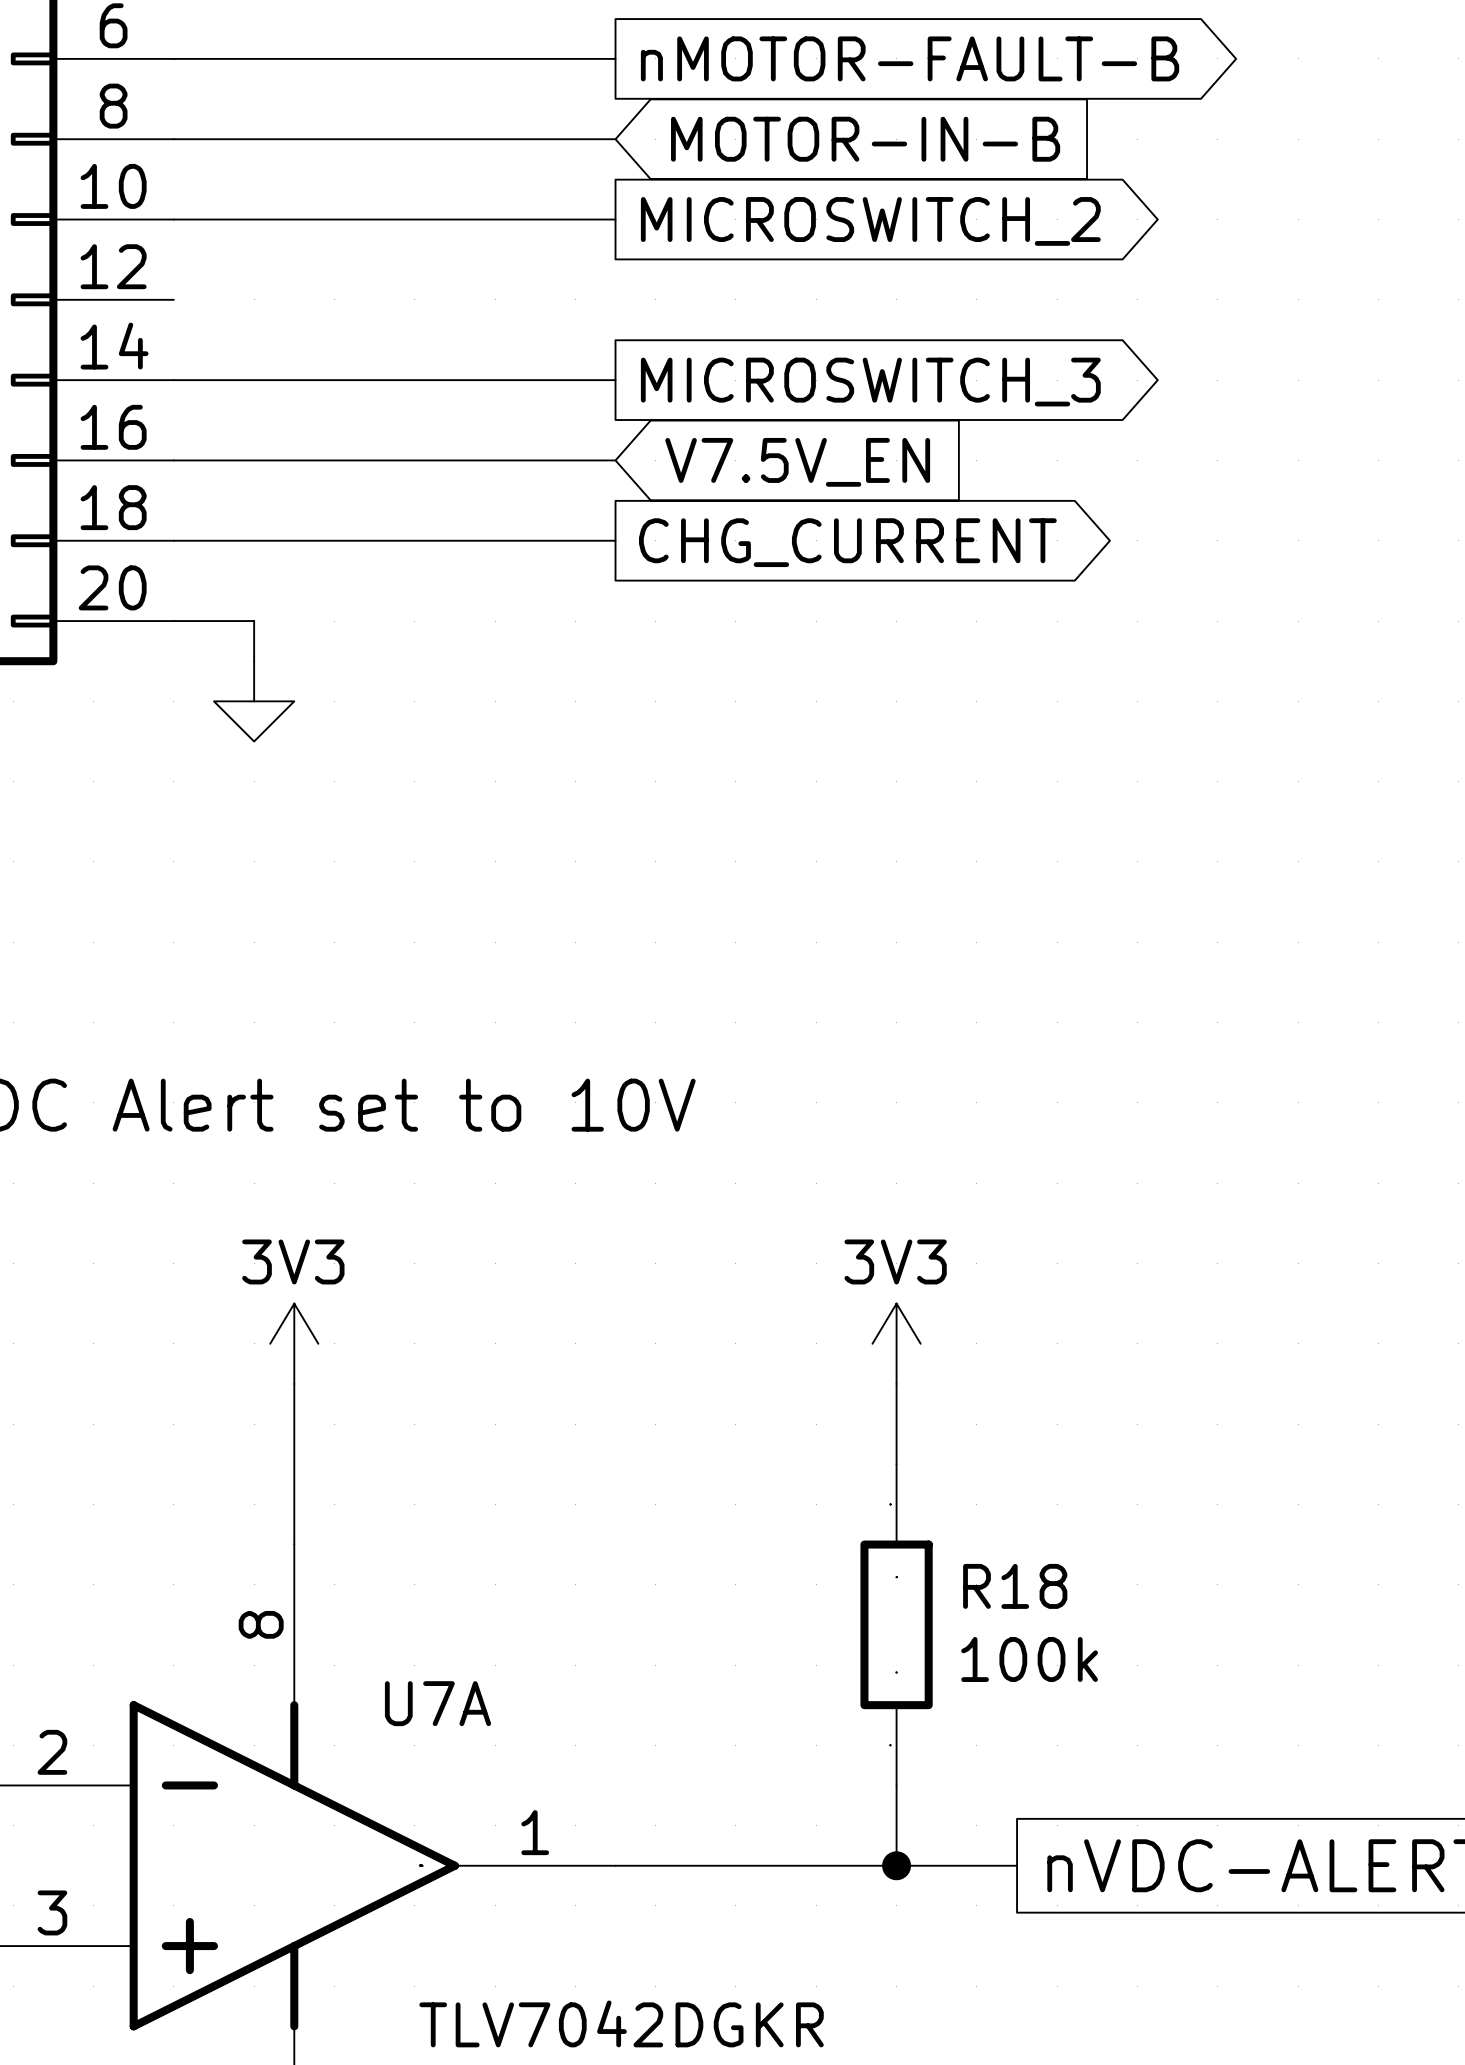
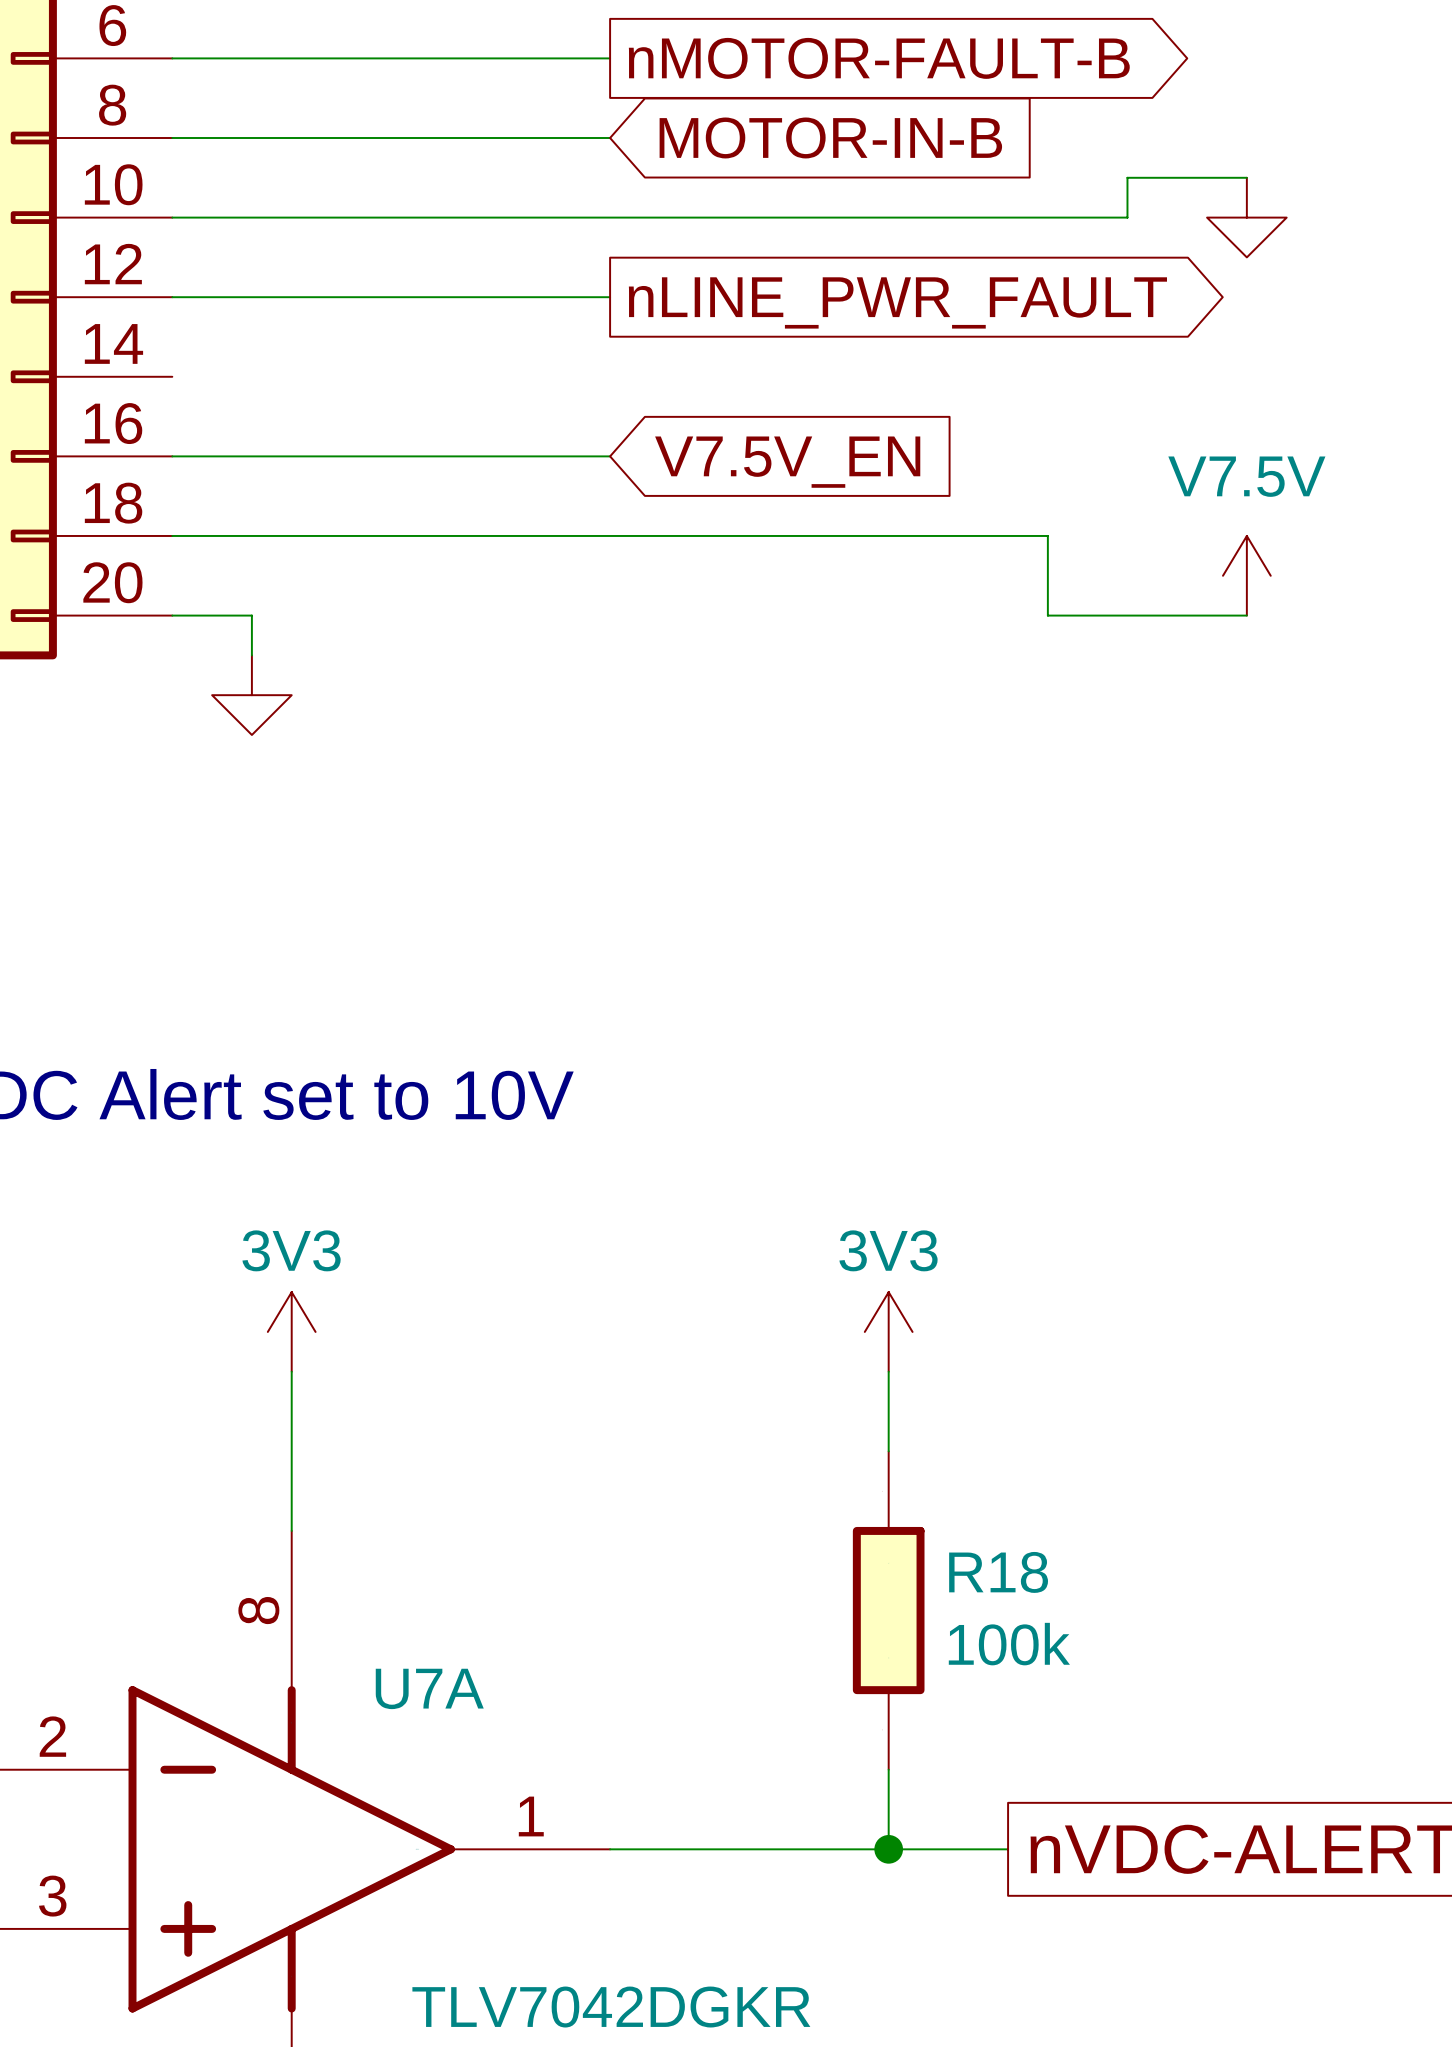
wire: none -> (1246, 177) (1127, 177) (1127, 217) (610, 217)
power symbol: none -> (1246, 217)
global label: MICROSWITCH_2 (870, 221) -> none
global label: none -> nLINE_PWR_FAULT (897, 302)
wire: (173, 380) (615, 380) -> (172, 297) (610, 297)
global label: MICROSWITCH_3 (870, 382) -> none
wire: none -> (610, 535) (1047, 535) (1047, 615) (1246, 615)
global label: CHG_CURRENT (847, 542) -> none
power symbol: none -> V7.5V (1246, 575)

